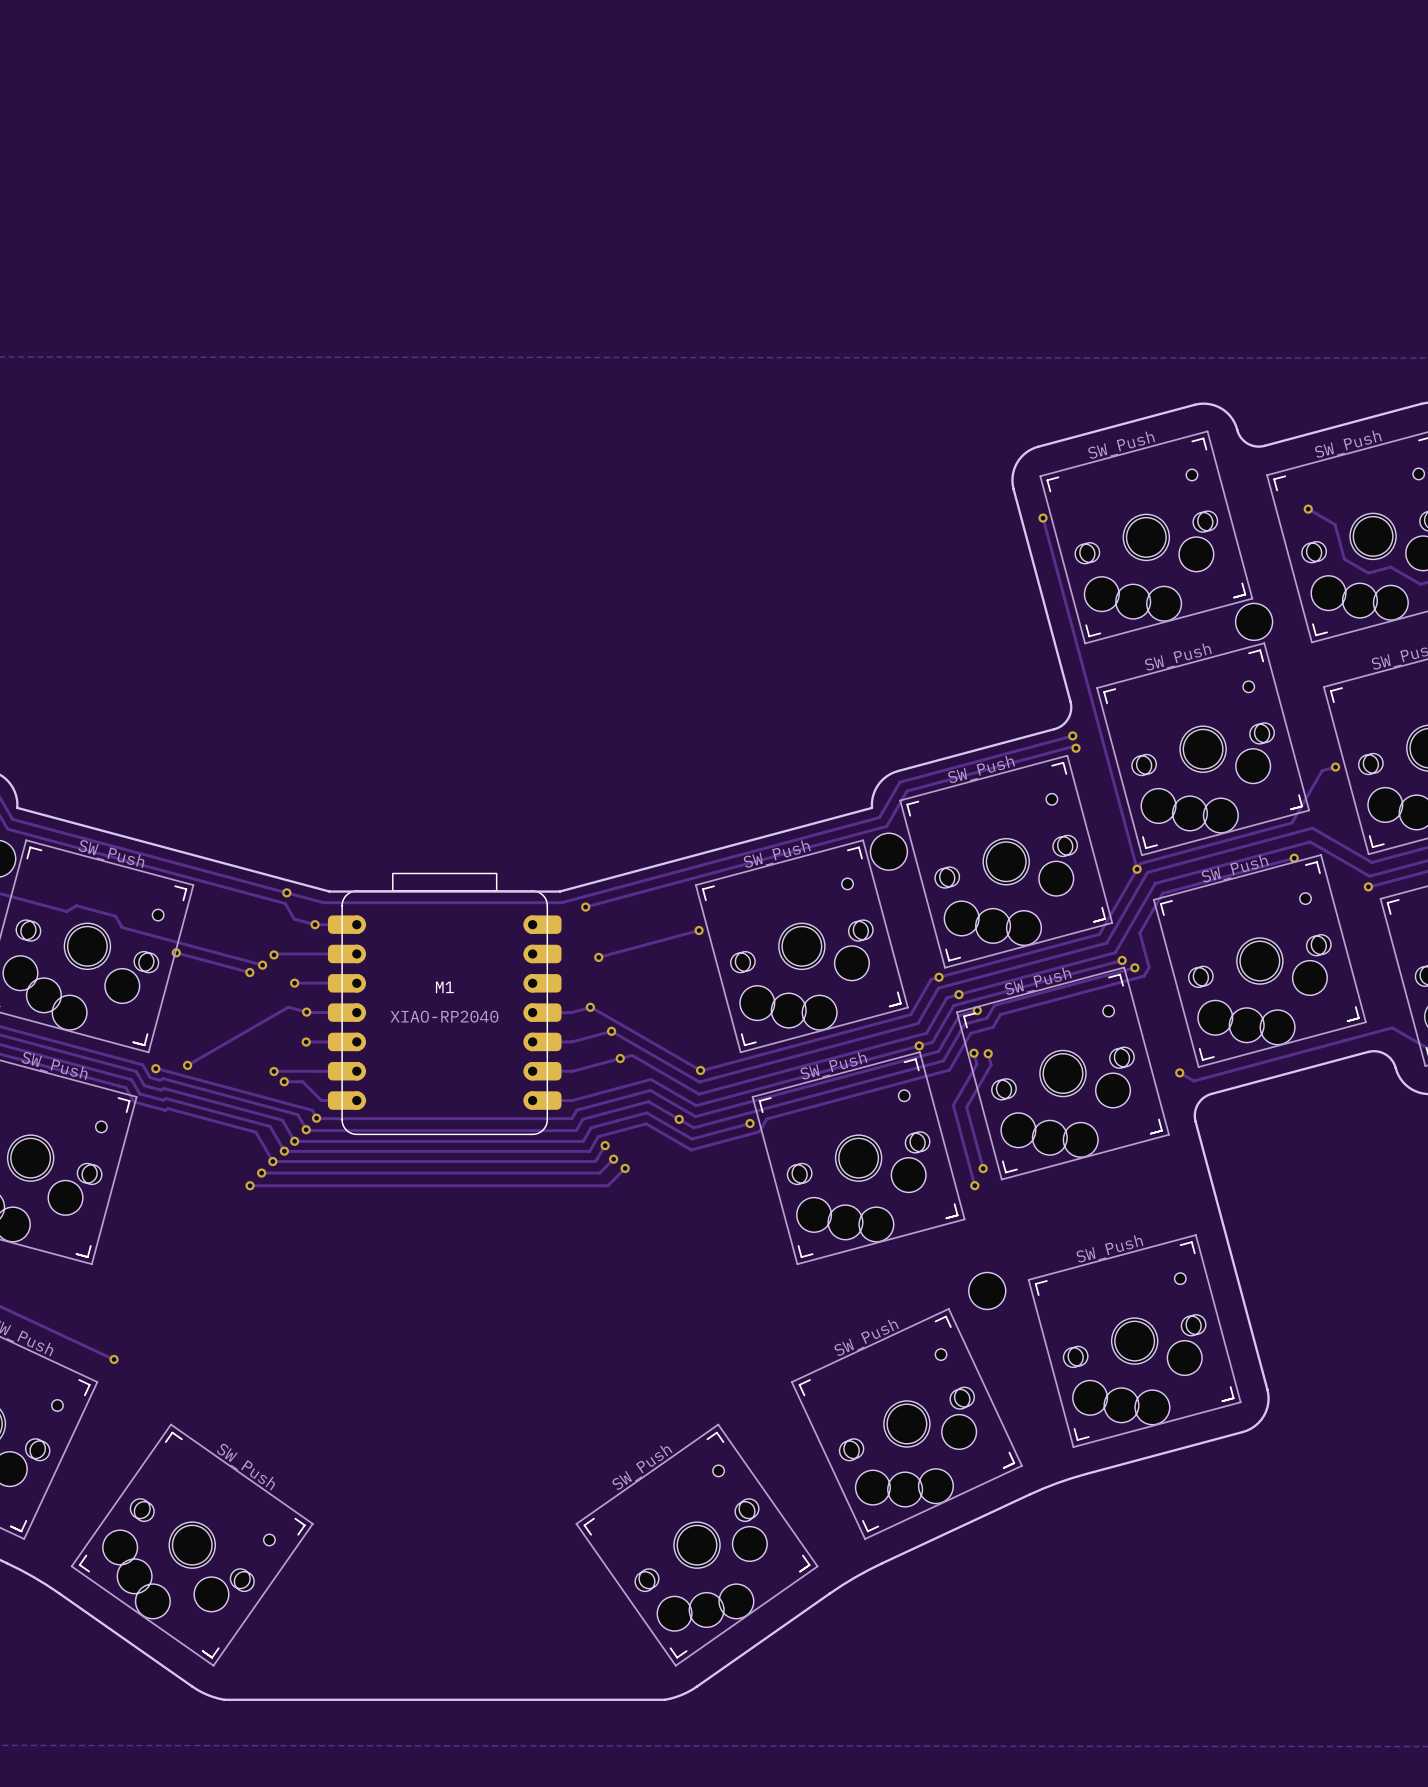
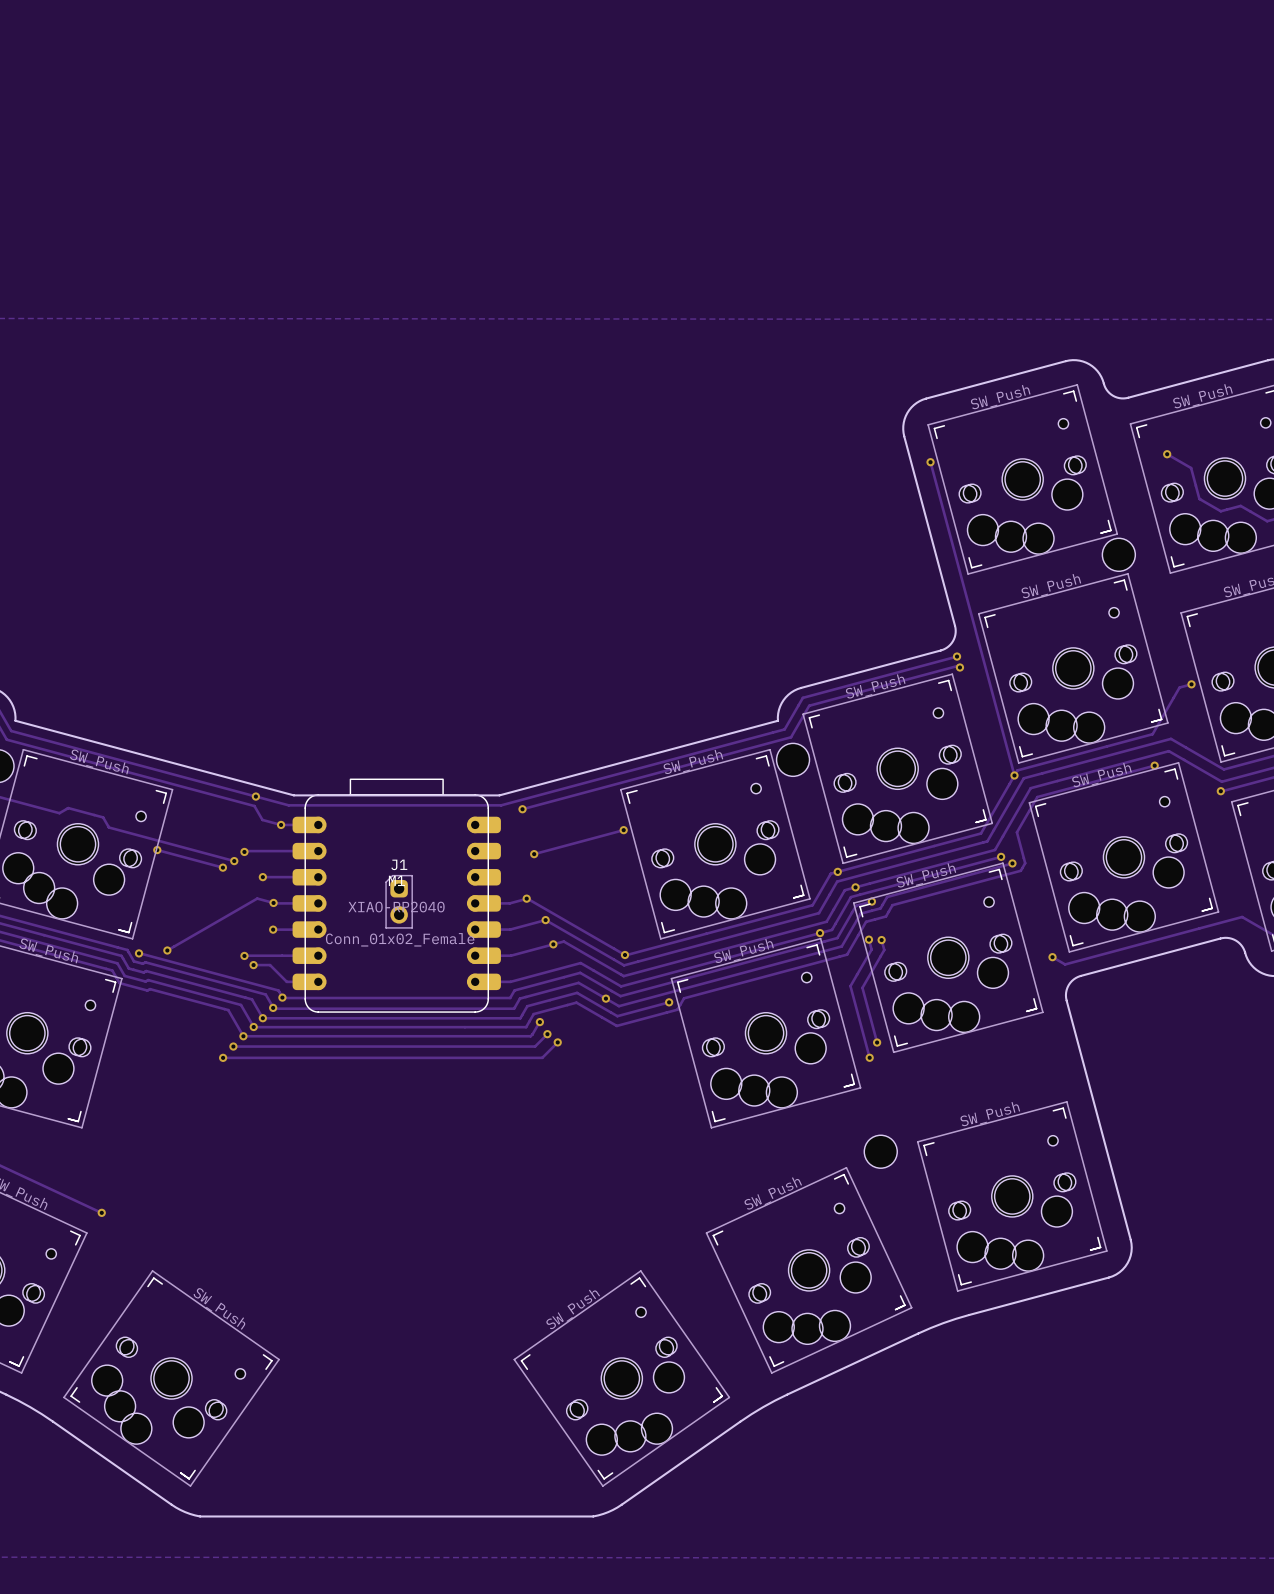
J1: none -> Conn_01x02_Female (399, 901)

